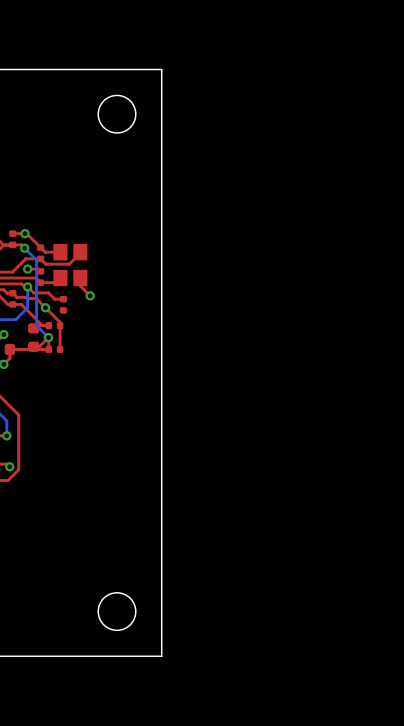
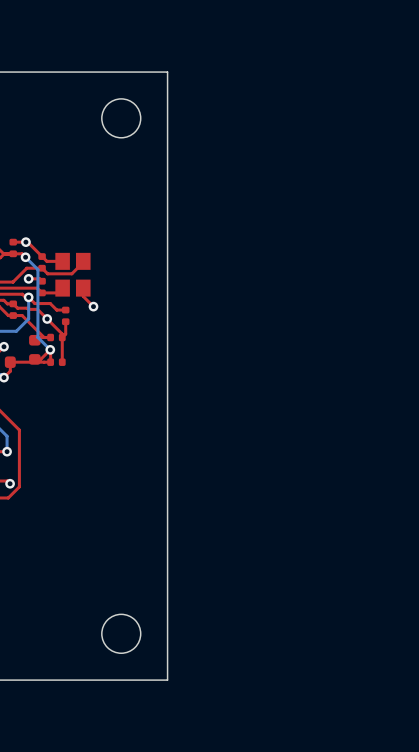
top track: none -> (65, 321) (65, 334) (62, 337)

